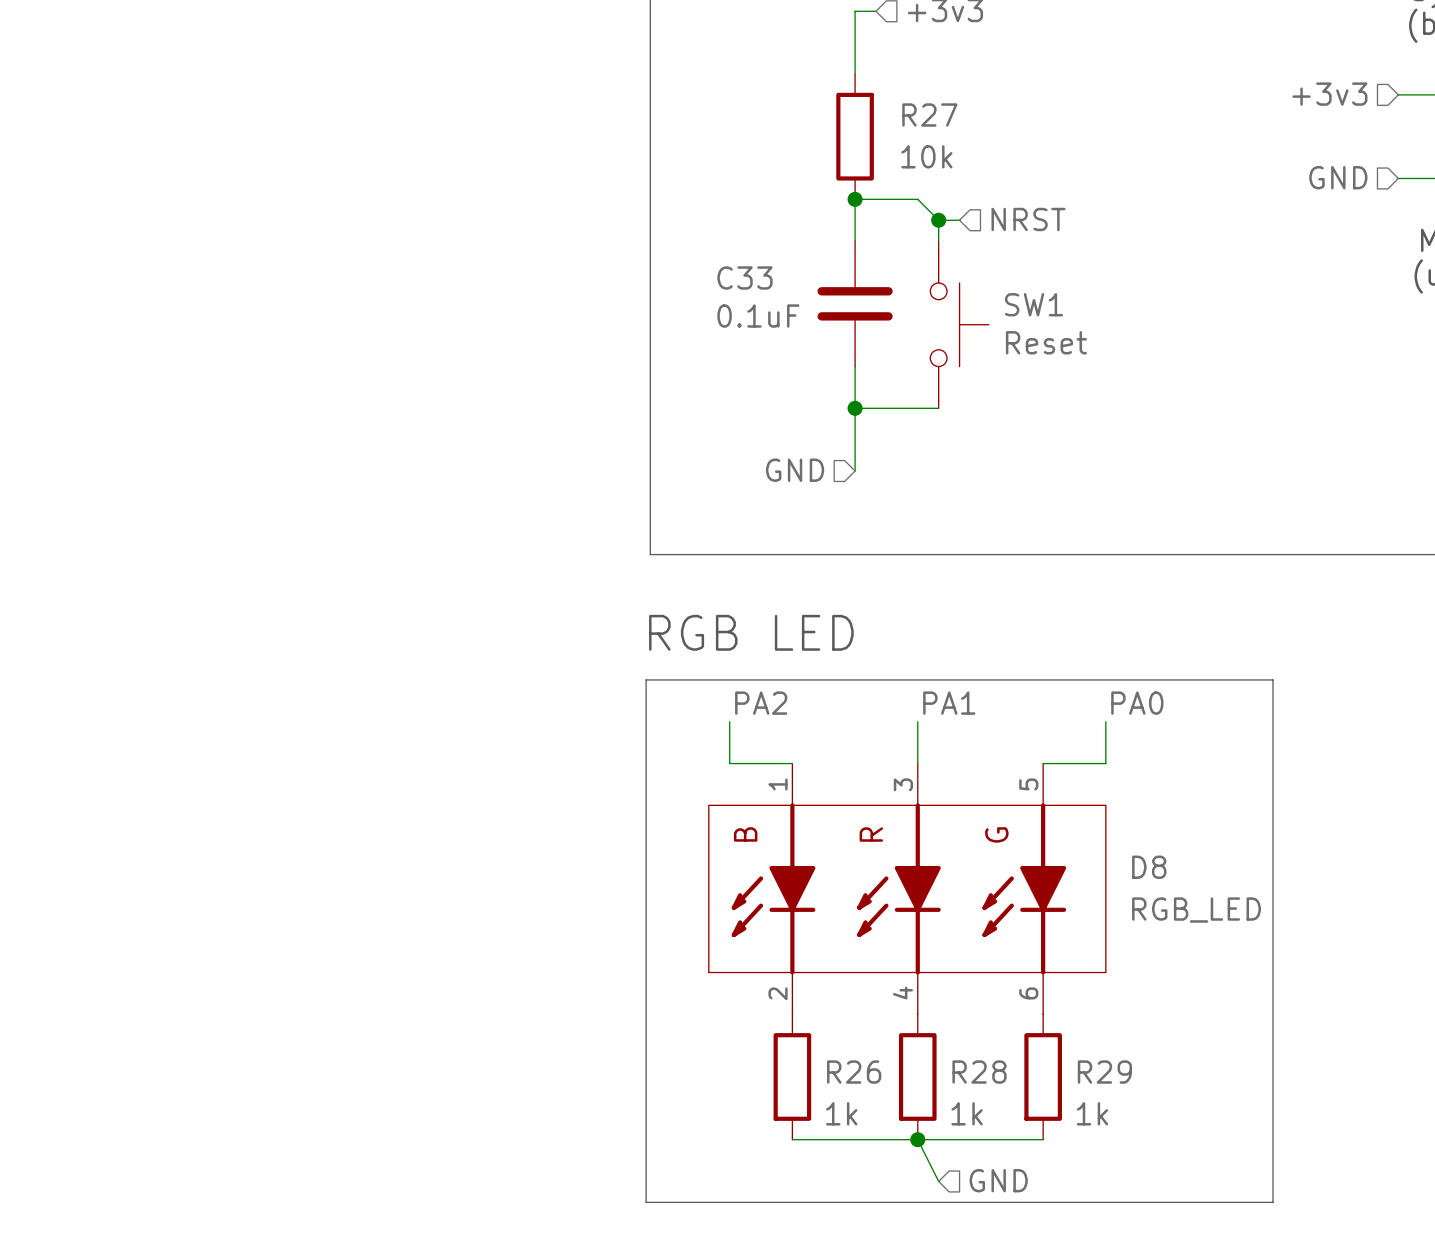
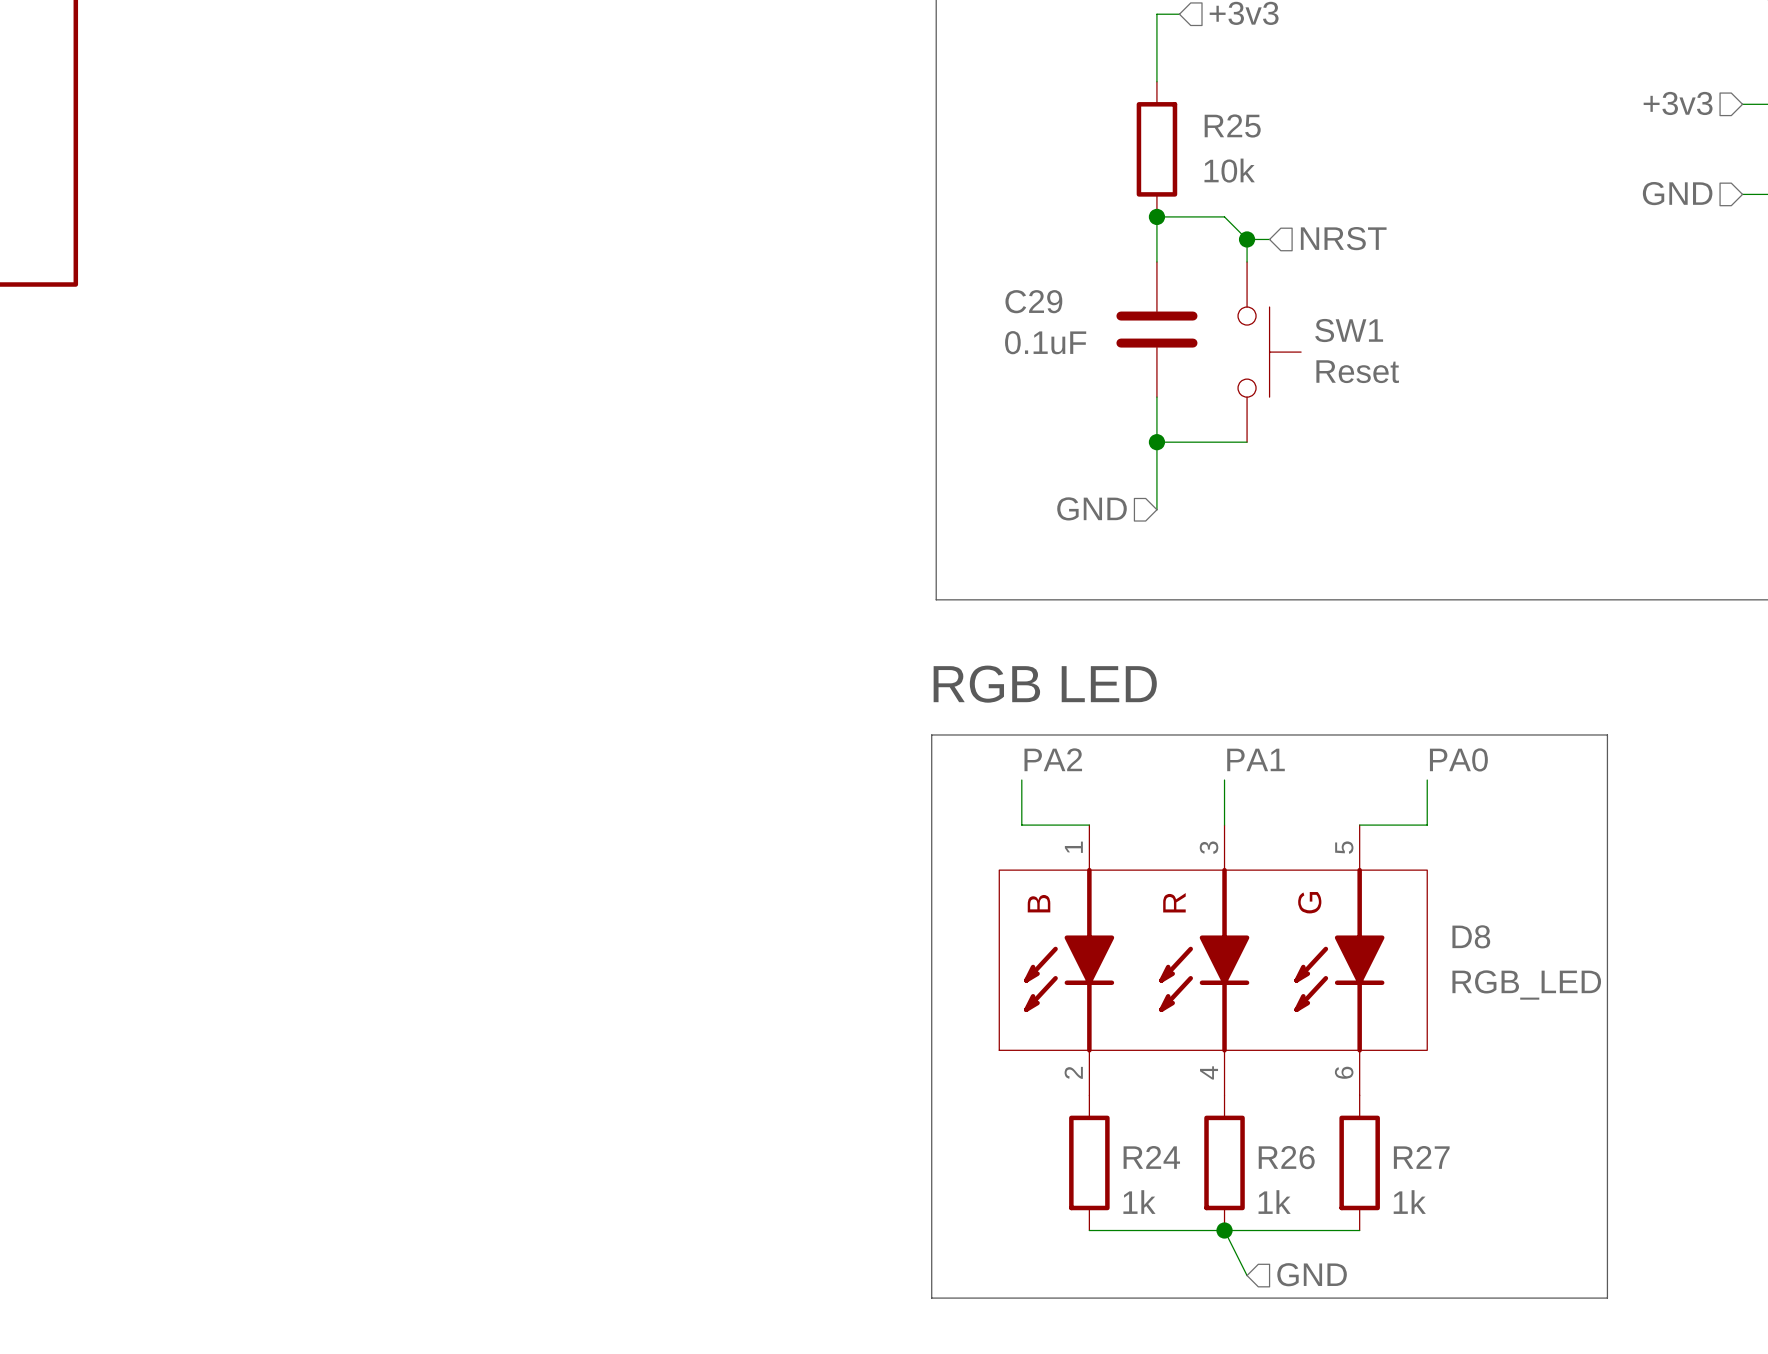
R27 name: R27 (929, 115) -> R25 (1232, 125)
C33 name: C33 (744, 277) -> C29 (1033, 301)
R26 name: R26 (854, 1072) -> R24 (1151, 1157)
R28 name: R28 (979, 1072) -> R26 (1286, 1157)
R29 name: R29 (1104, 1072) -> R27 (1421, 1157)

